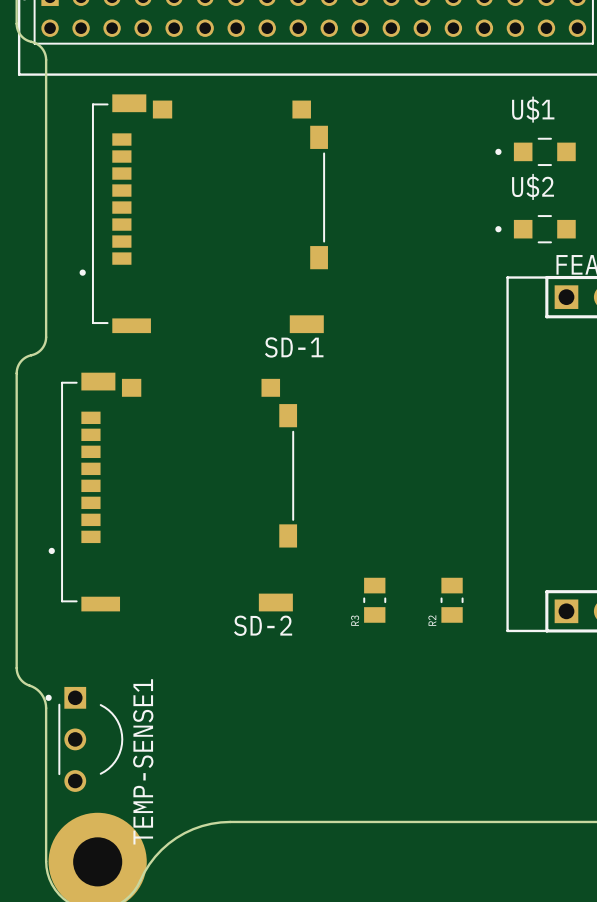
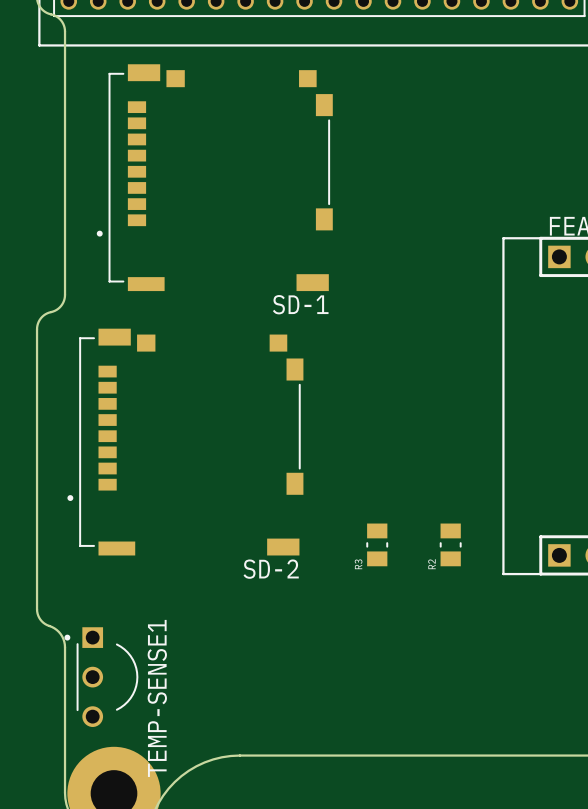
U$1: (535, 151) -> none
U$2: (535, 229) -> none

